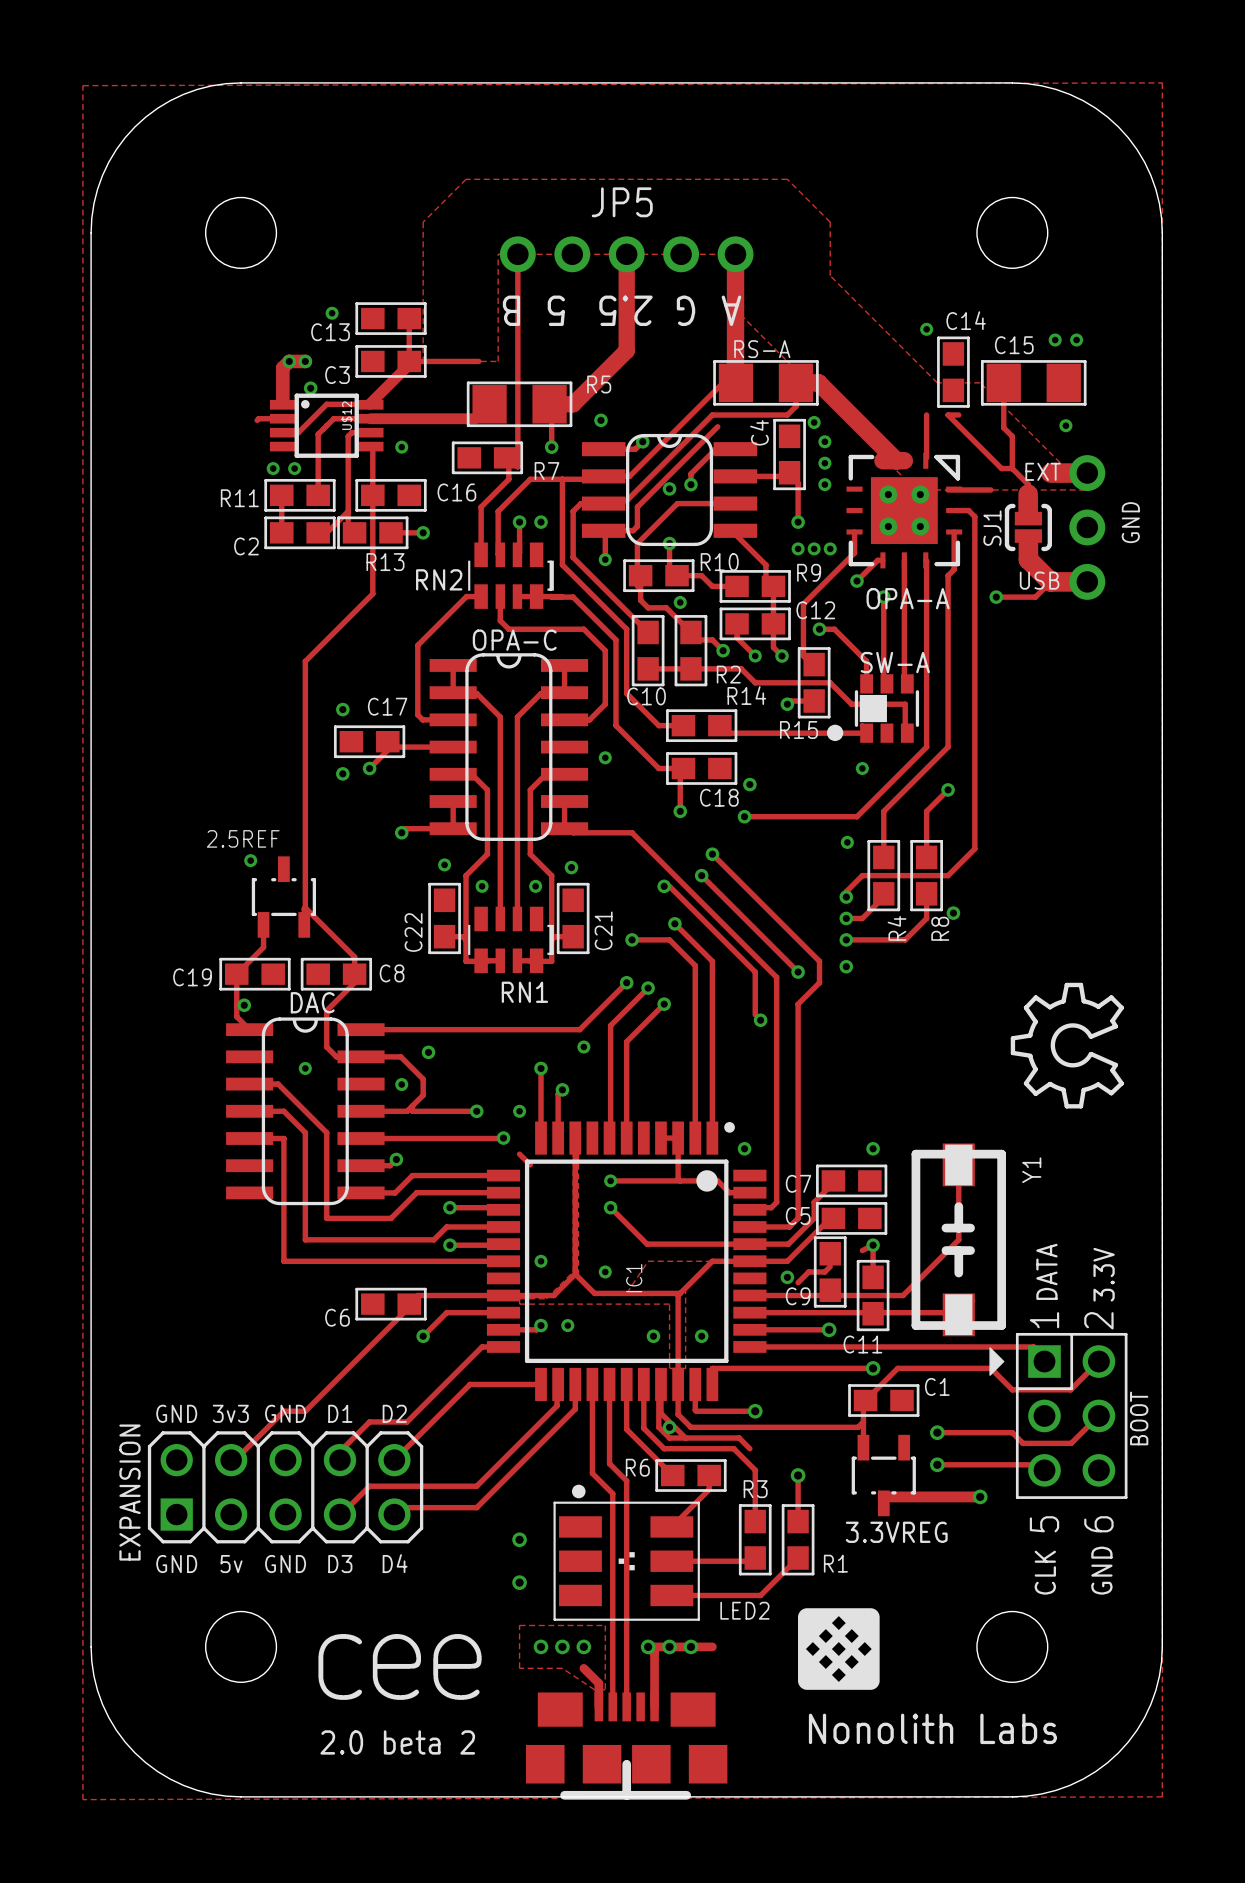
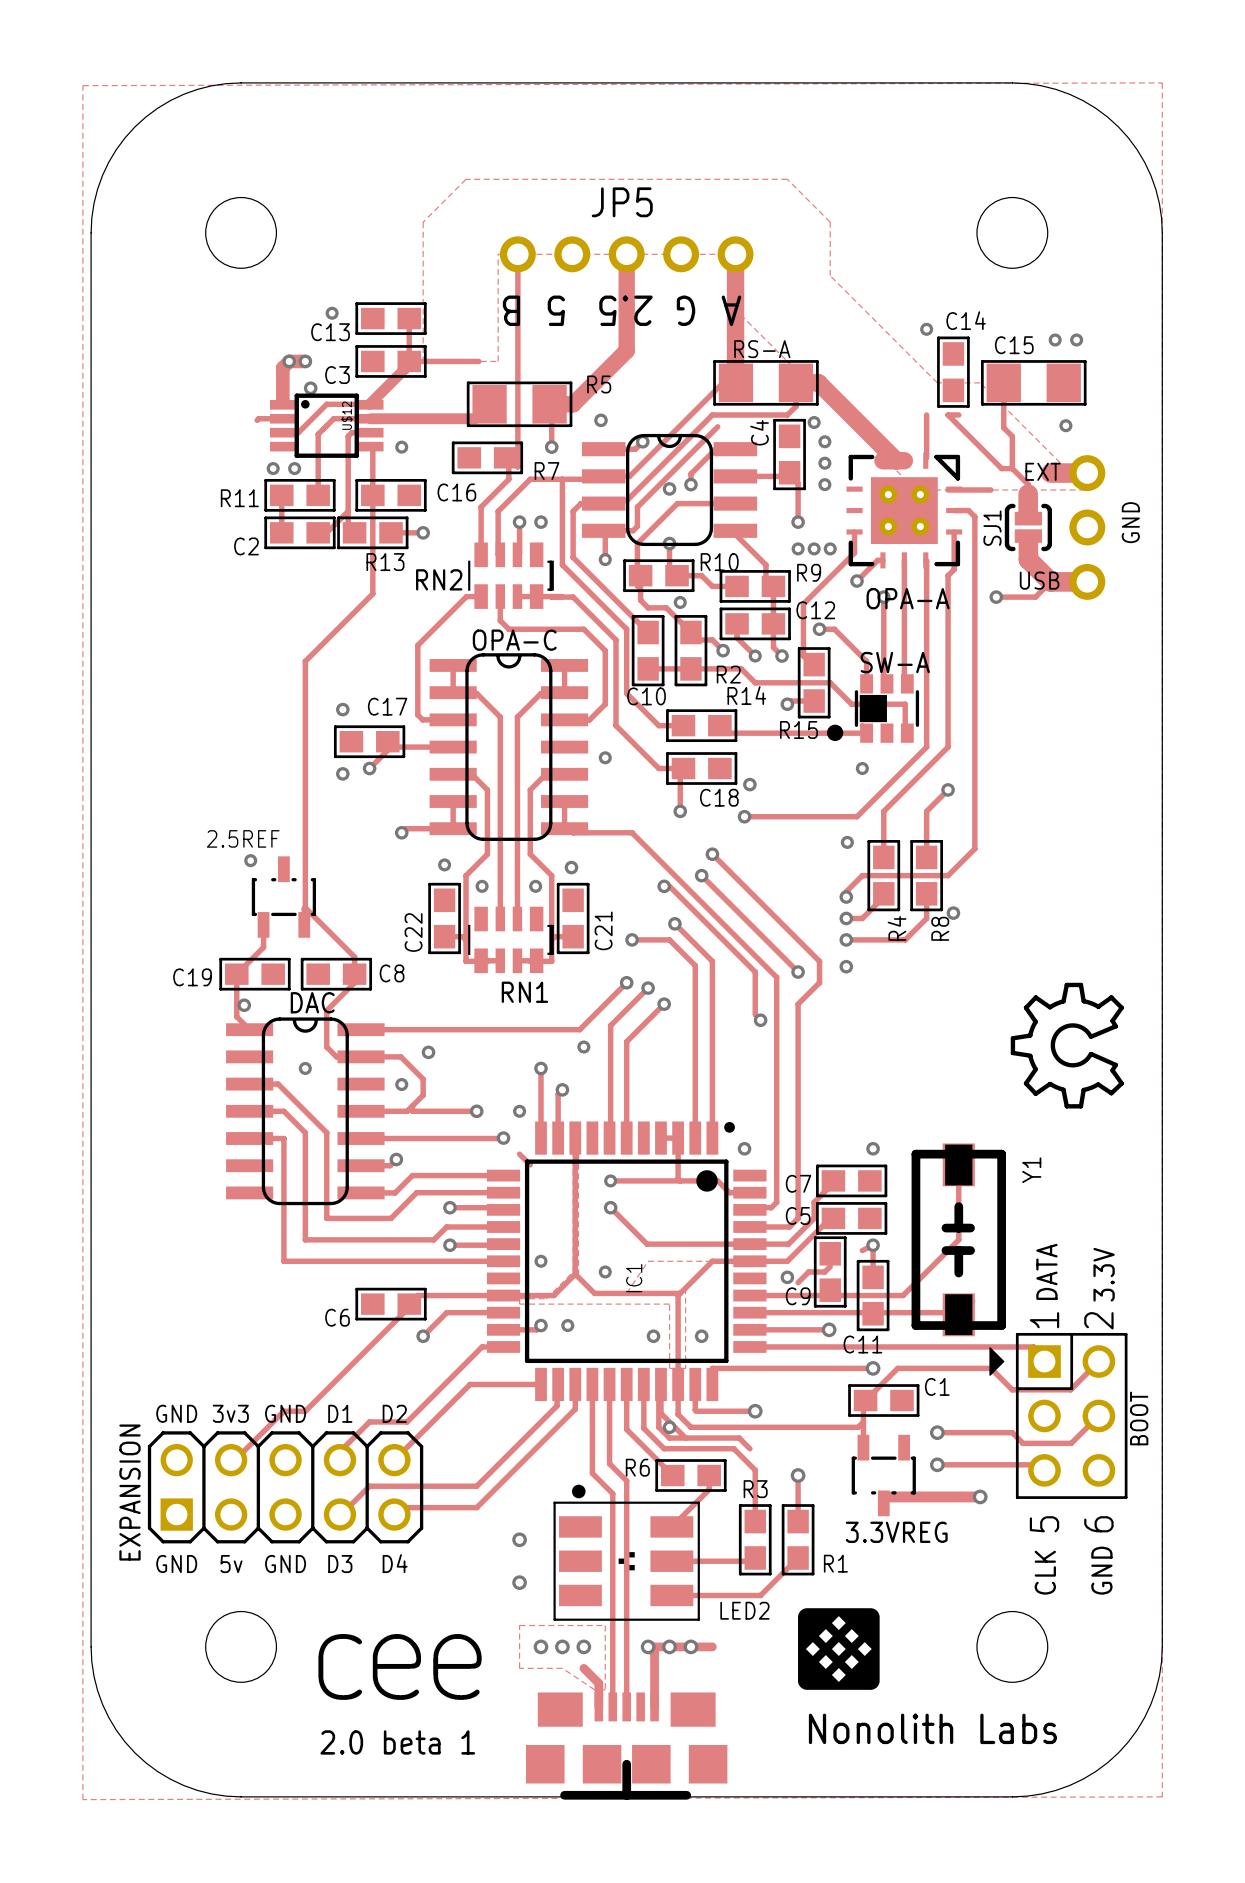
text: 2.0 beta 2 (397, 1742) -> 2.0 beta 1 (397, 1742)

